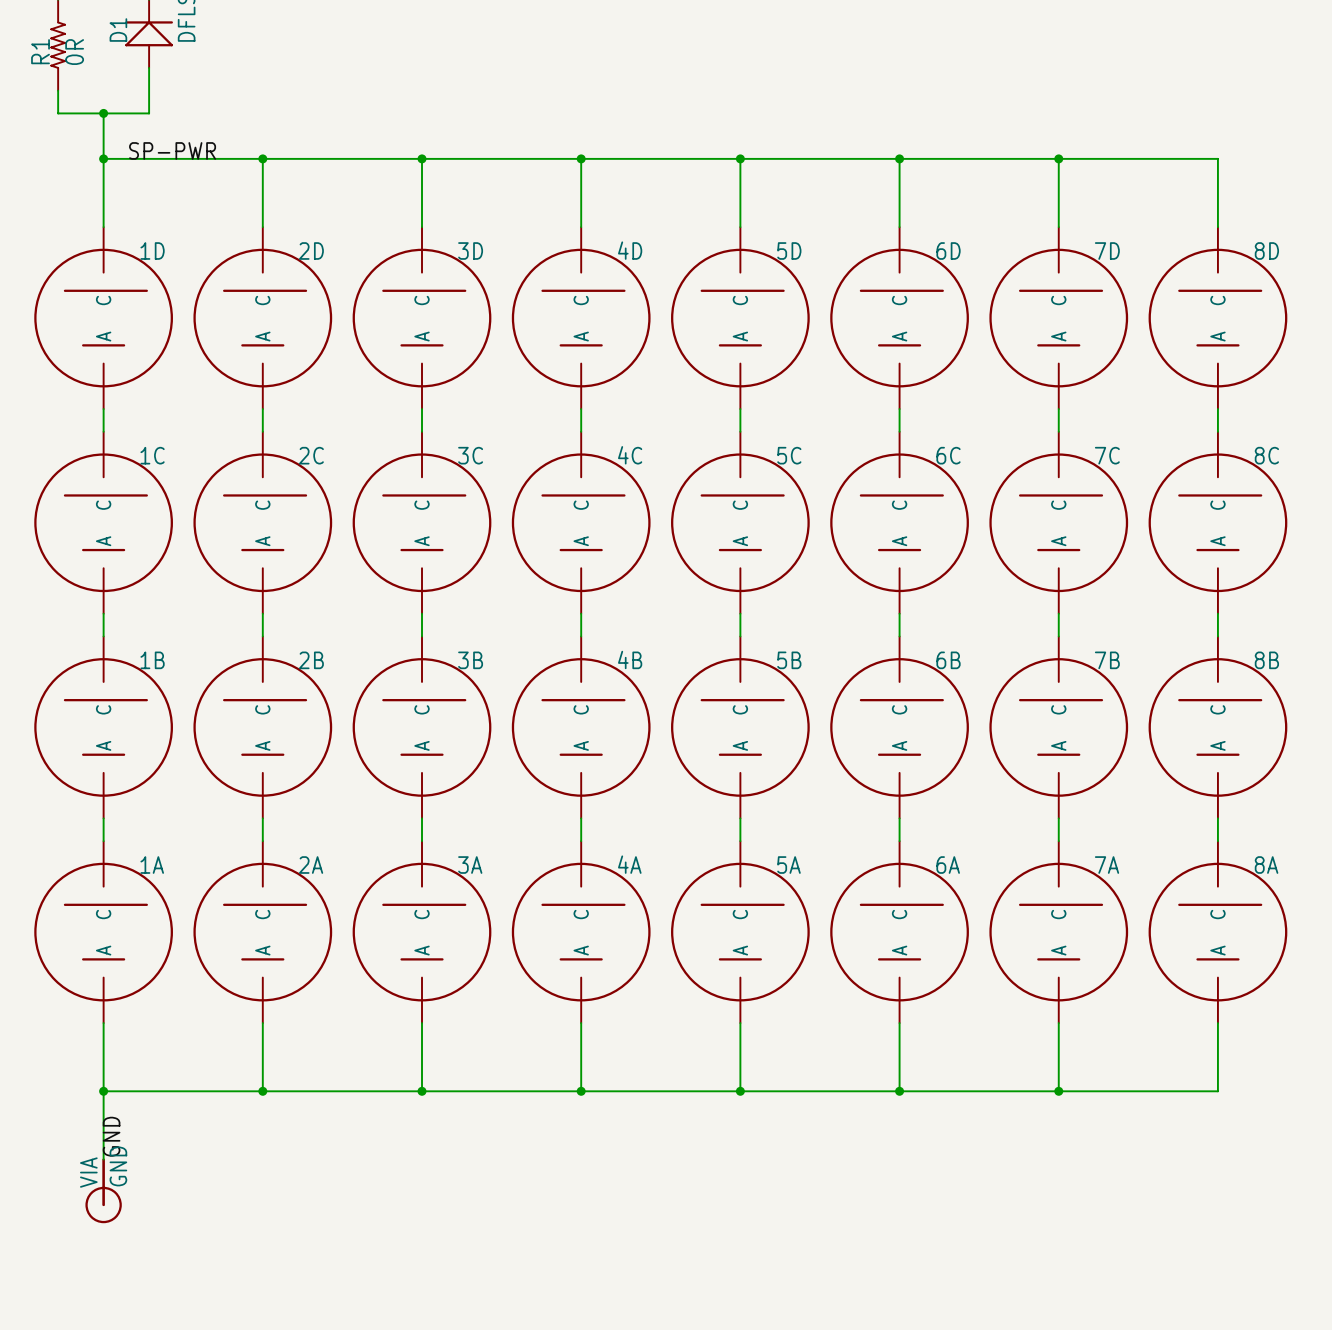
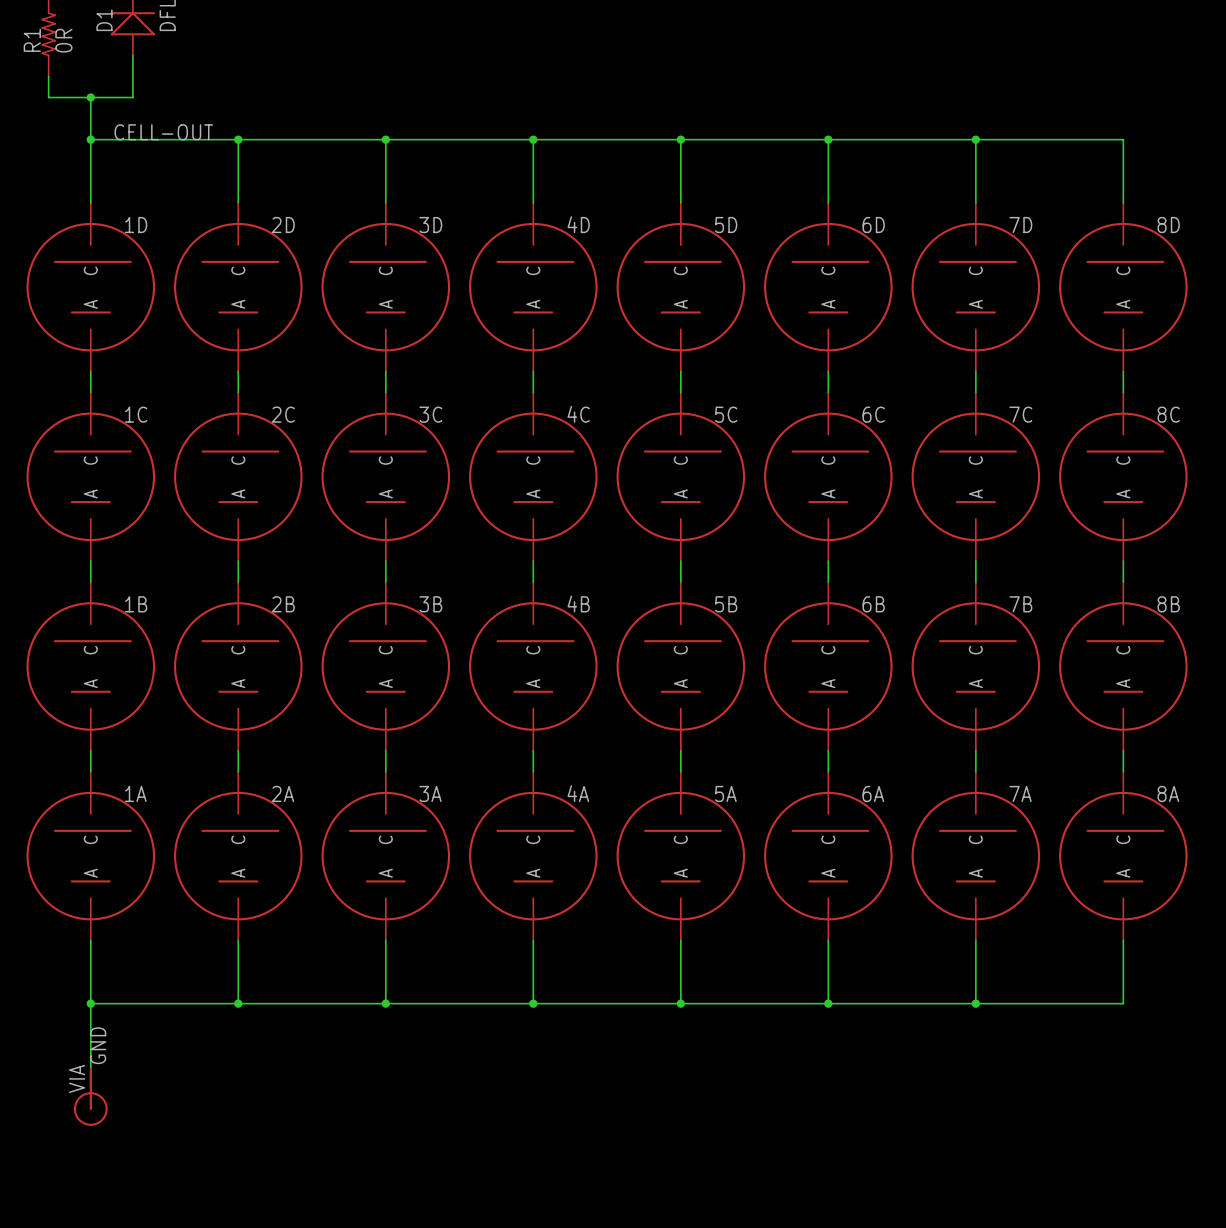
label: SP-PWR (172, 150) -> CELL-OUT (163, 132)
part value: GND (118, 1166) -> none

